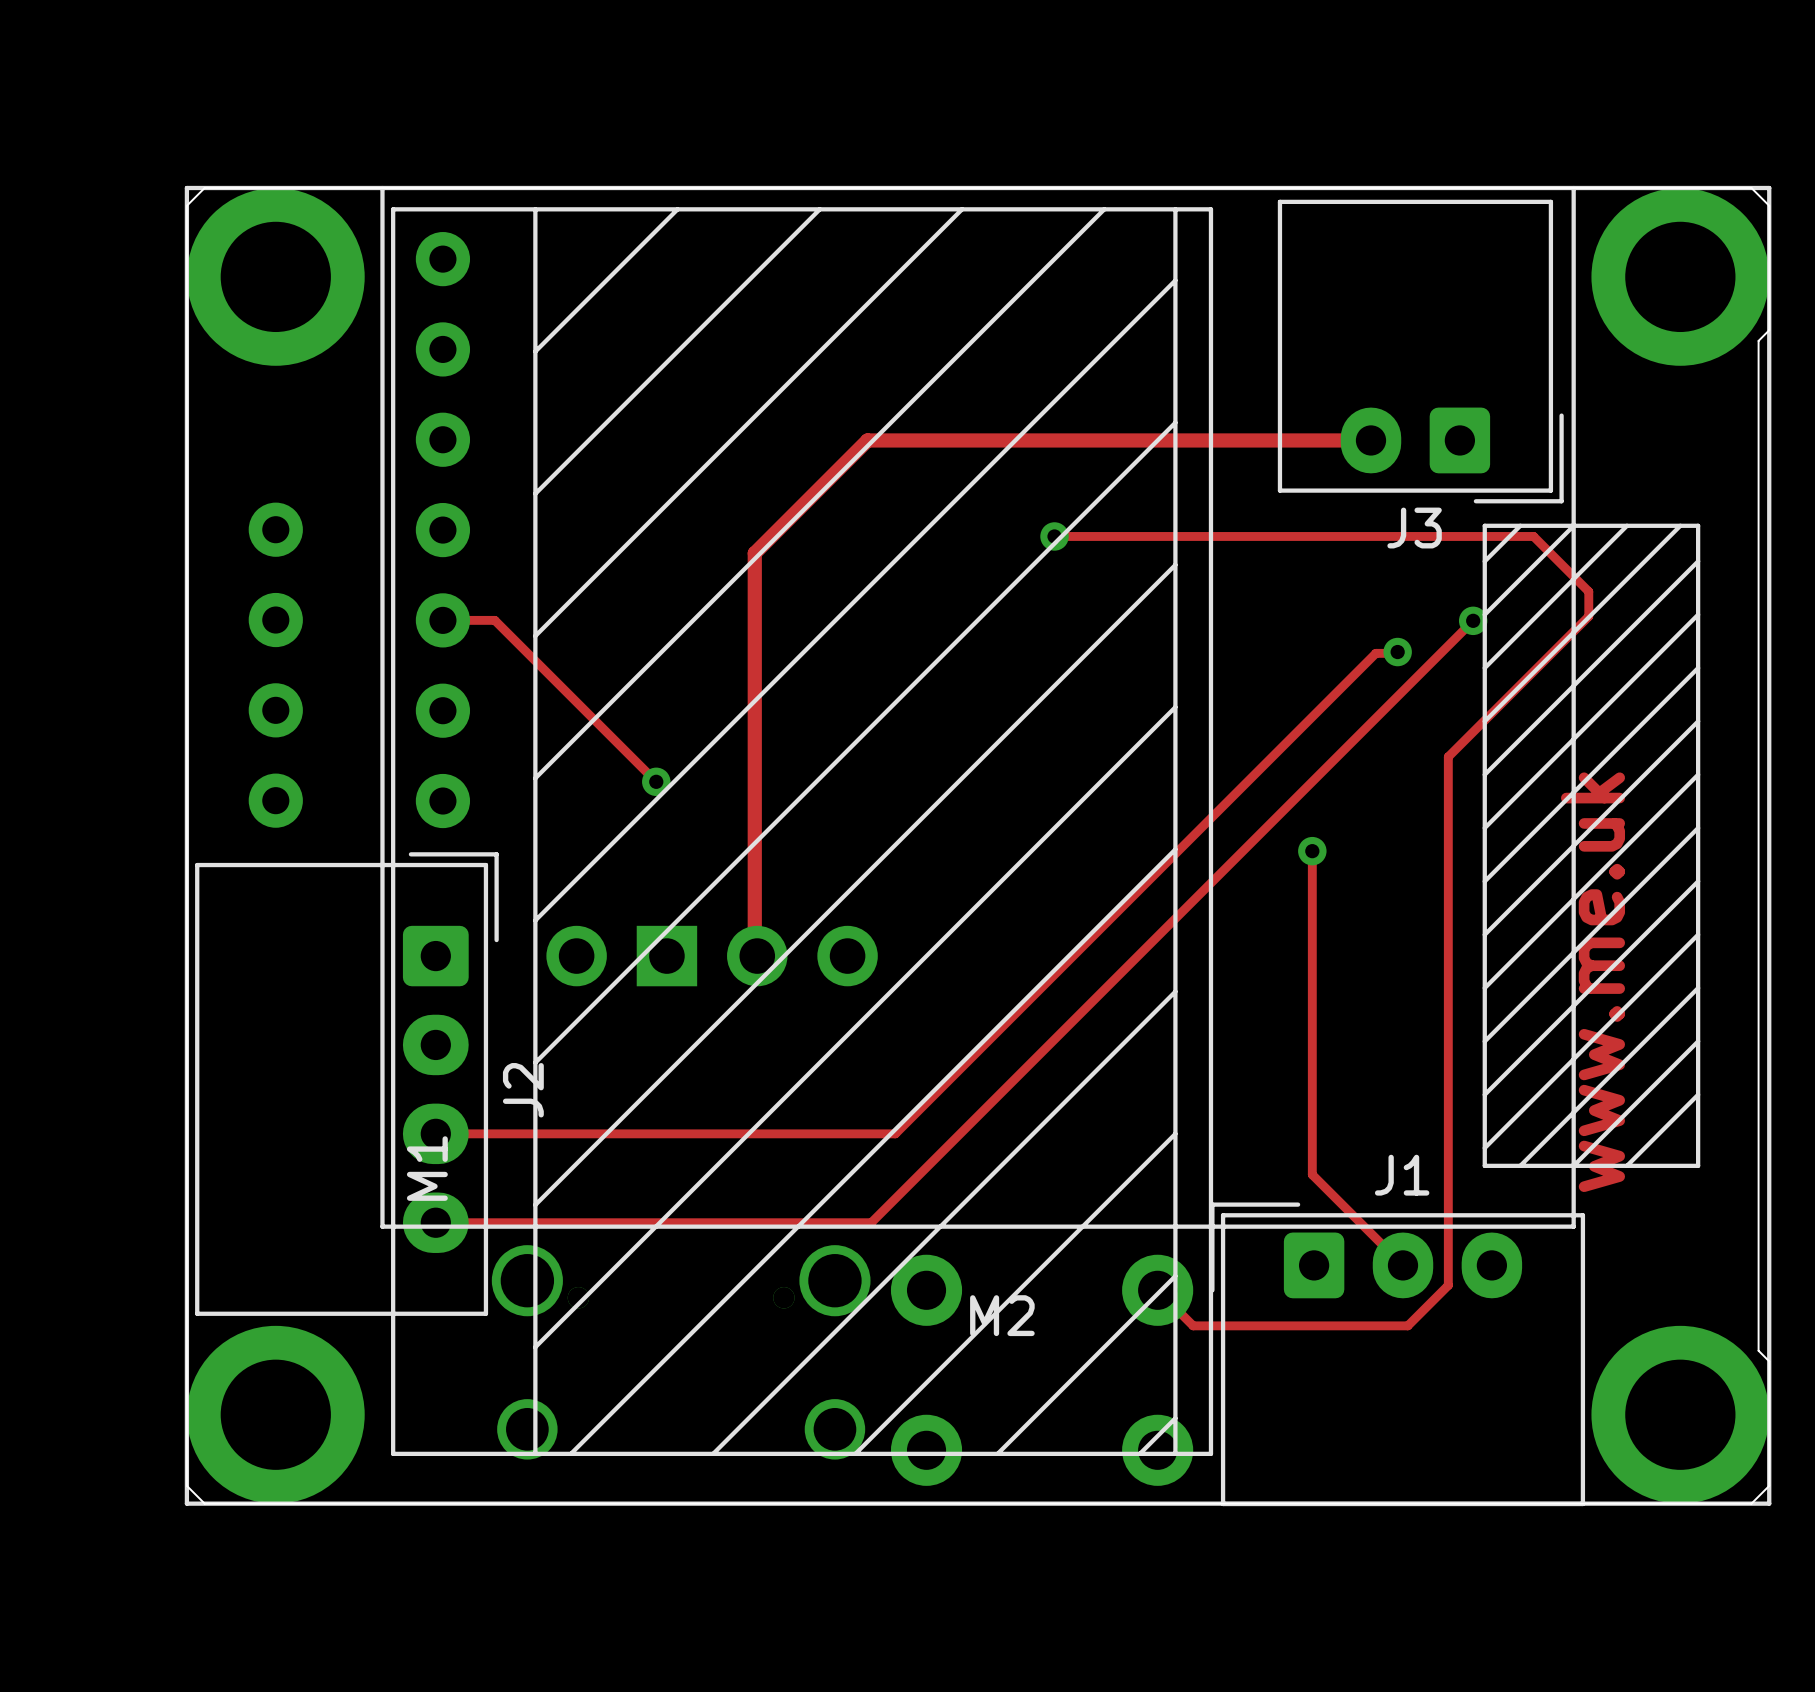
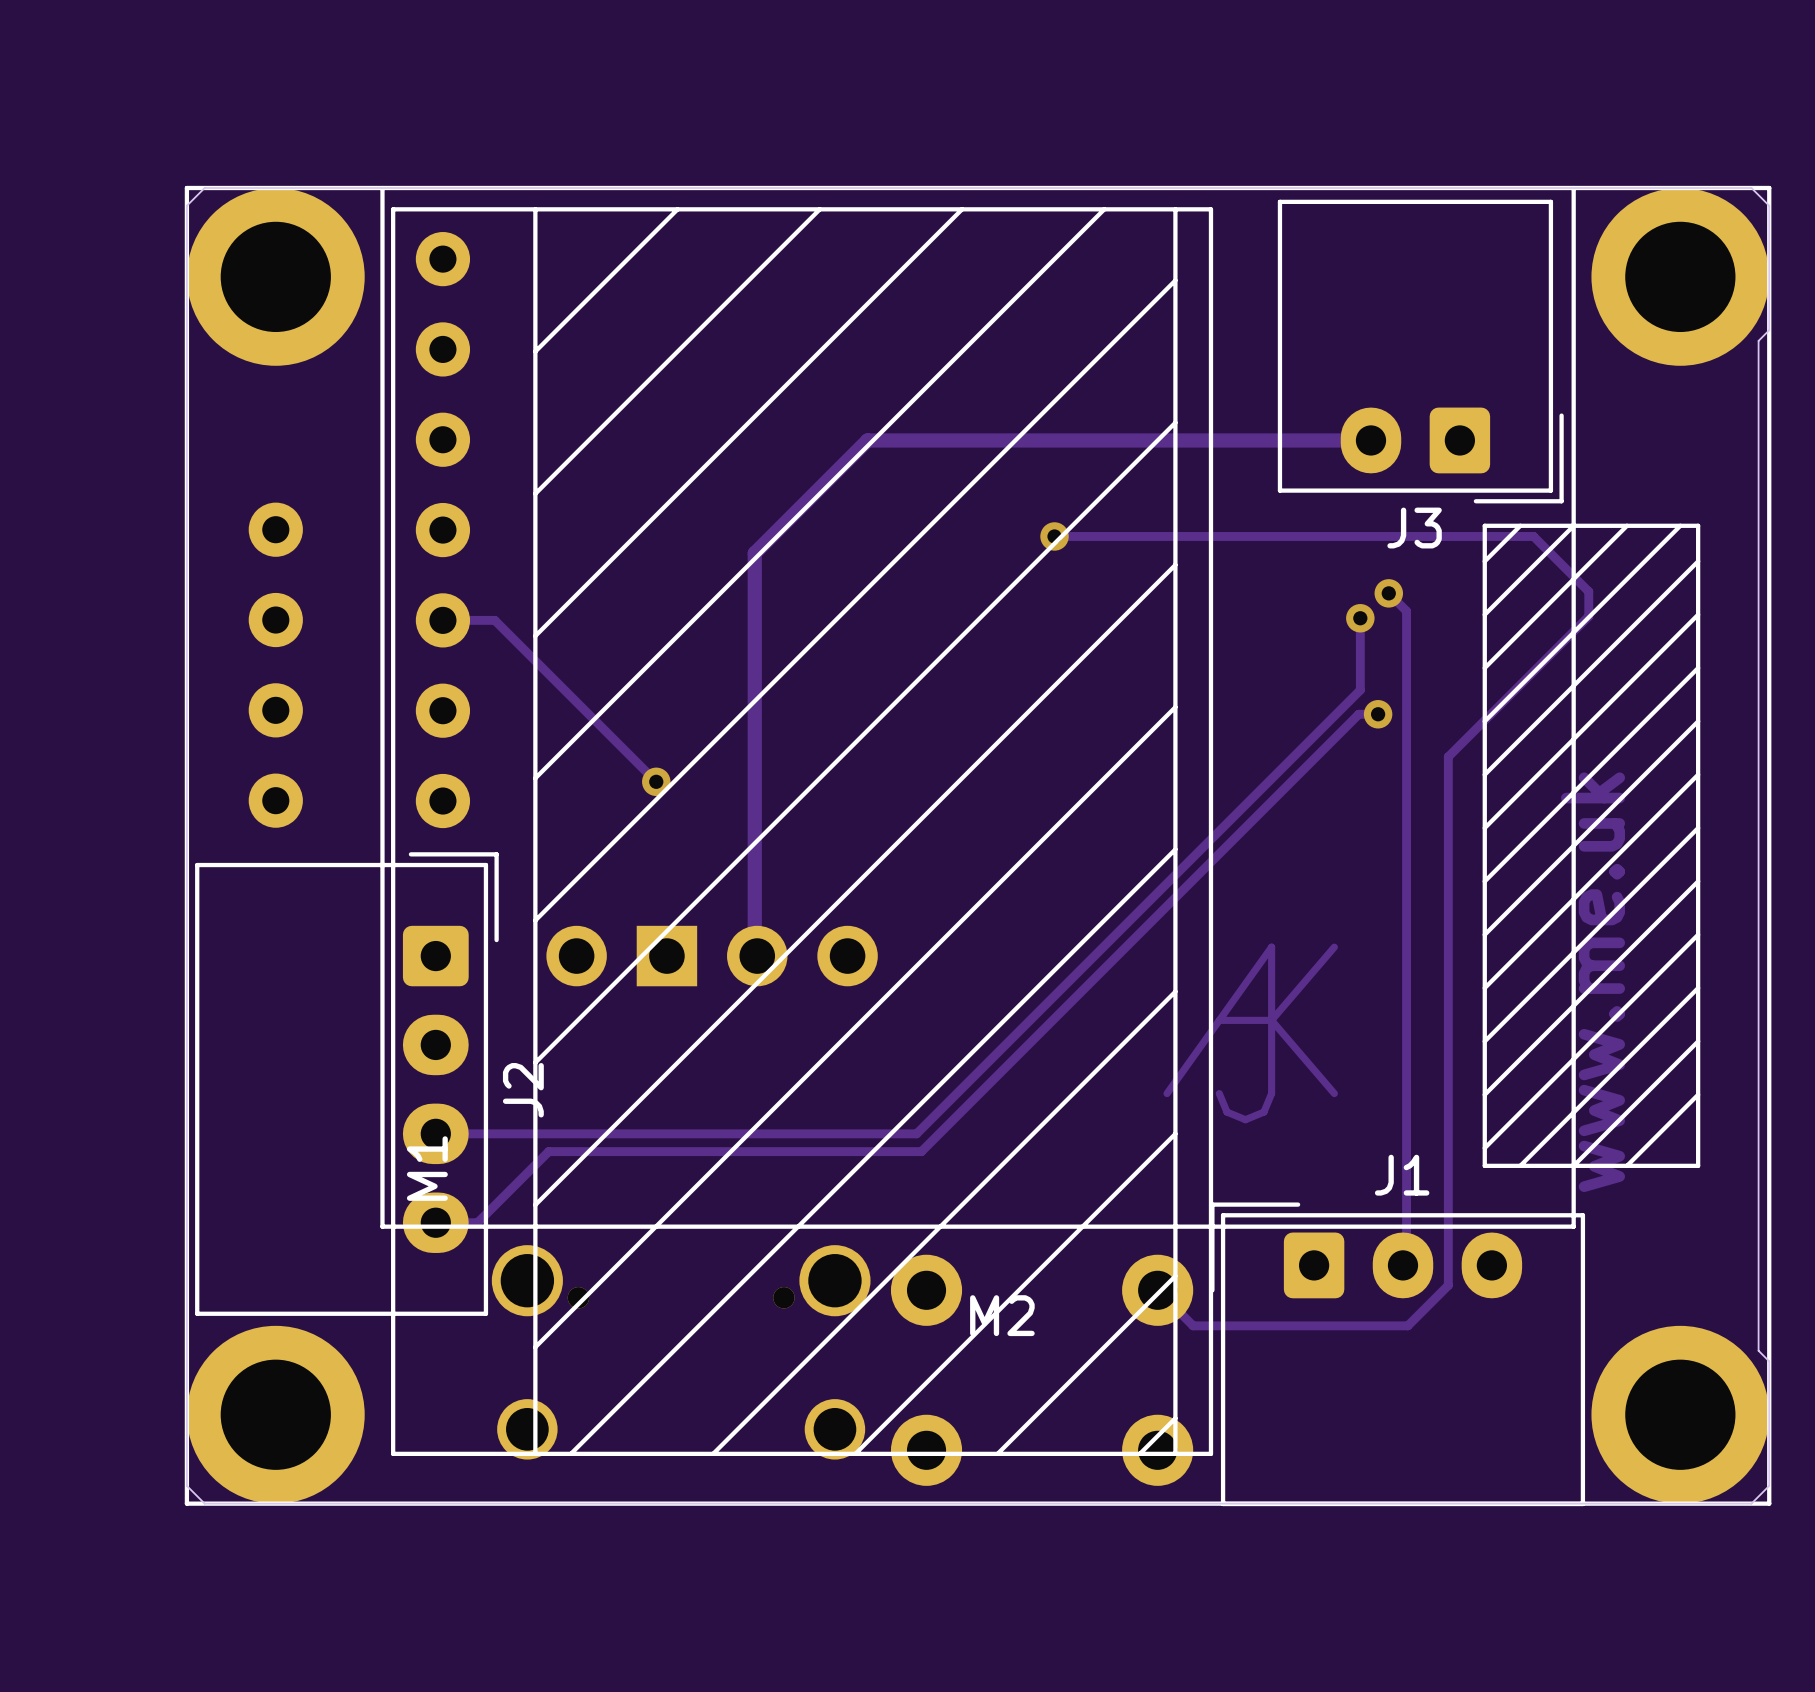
track: none -> (1388, 593) (1406, 611) (1406, 1265)
via: none -> (1388, 593)
via: none -> (1360, 618)
track: (1473, 620) (871, 1222) (477, 1222) -> (1378, 714) (1358, 714) (921, 1151) (548, 1151) (477, 1222)
via: (1473, 620) -> none
track: (1397, 652) (1375, 653) (895, 1133) -> (1360, 618) (1360, 690) (916, 1133) (895, 1133)
via: (1397, 652) -> none
via: none -> (1378, 714)
track: (1312, 851) (1312, 1174) (1402, 1265) -> none
via: (1312, 851) -> none
drawing: none -> [1163, 943, 1338, 1124]

